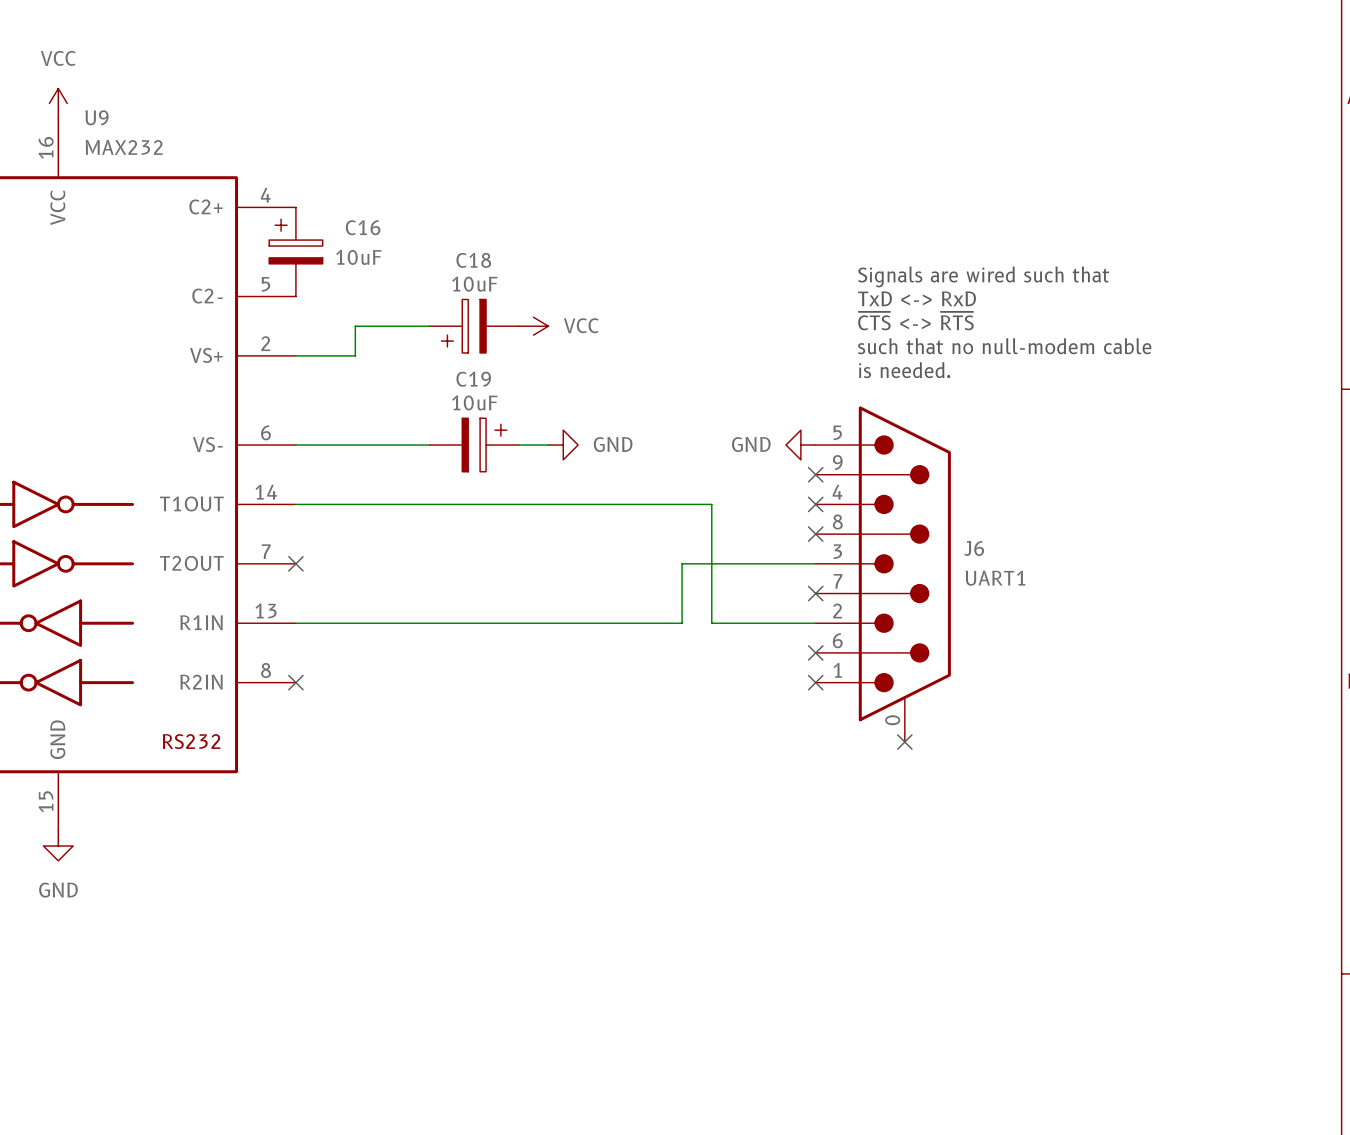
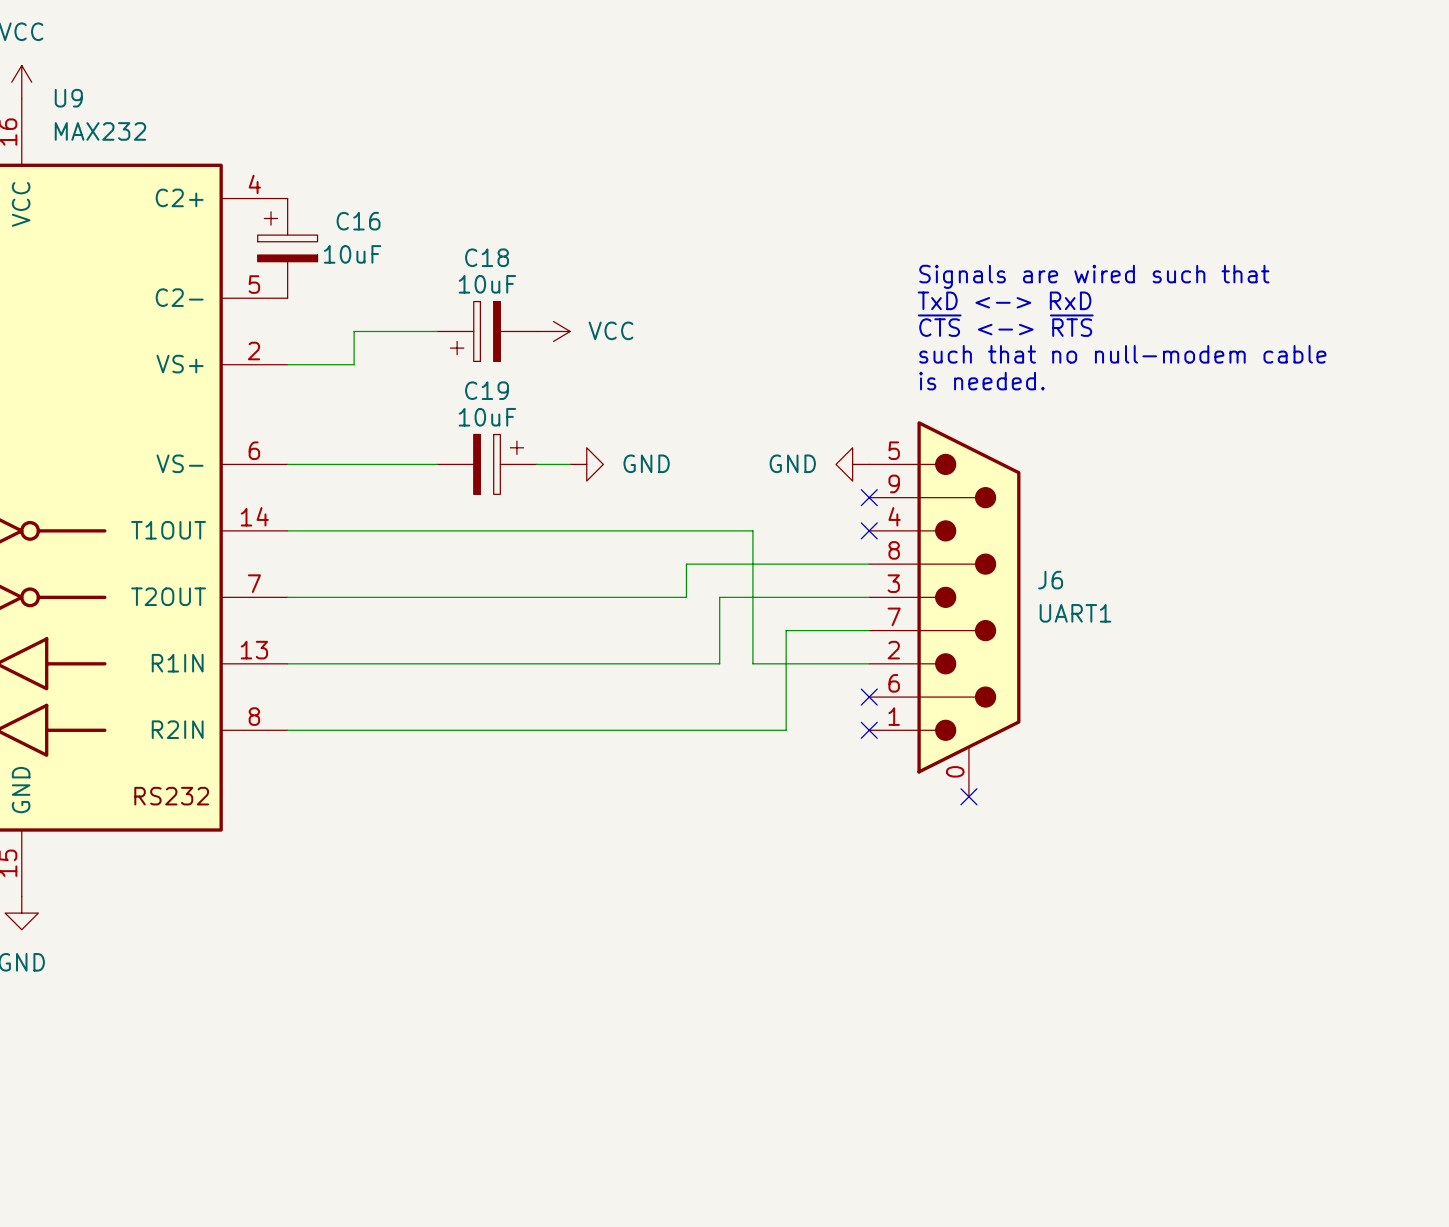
wire: none -> (869, 564) (686, 564) (686, 597) (287, 597)
no-connect mark: (815, 534) -> none
no-connect mark: (295, 563) -> none
wire: none -> (869, 630) (786, 630) (786, 730) (287, 730)
no-connect mark: (815, 593) -> none
no-connect mark: (295, 682) -> none

